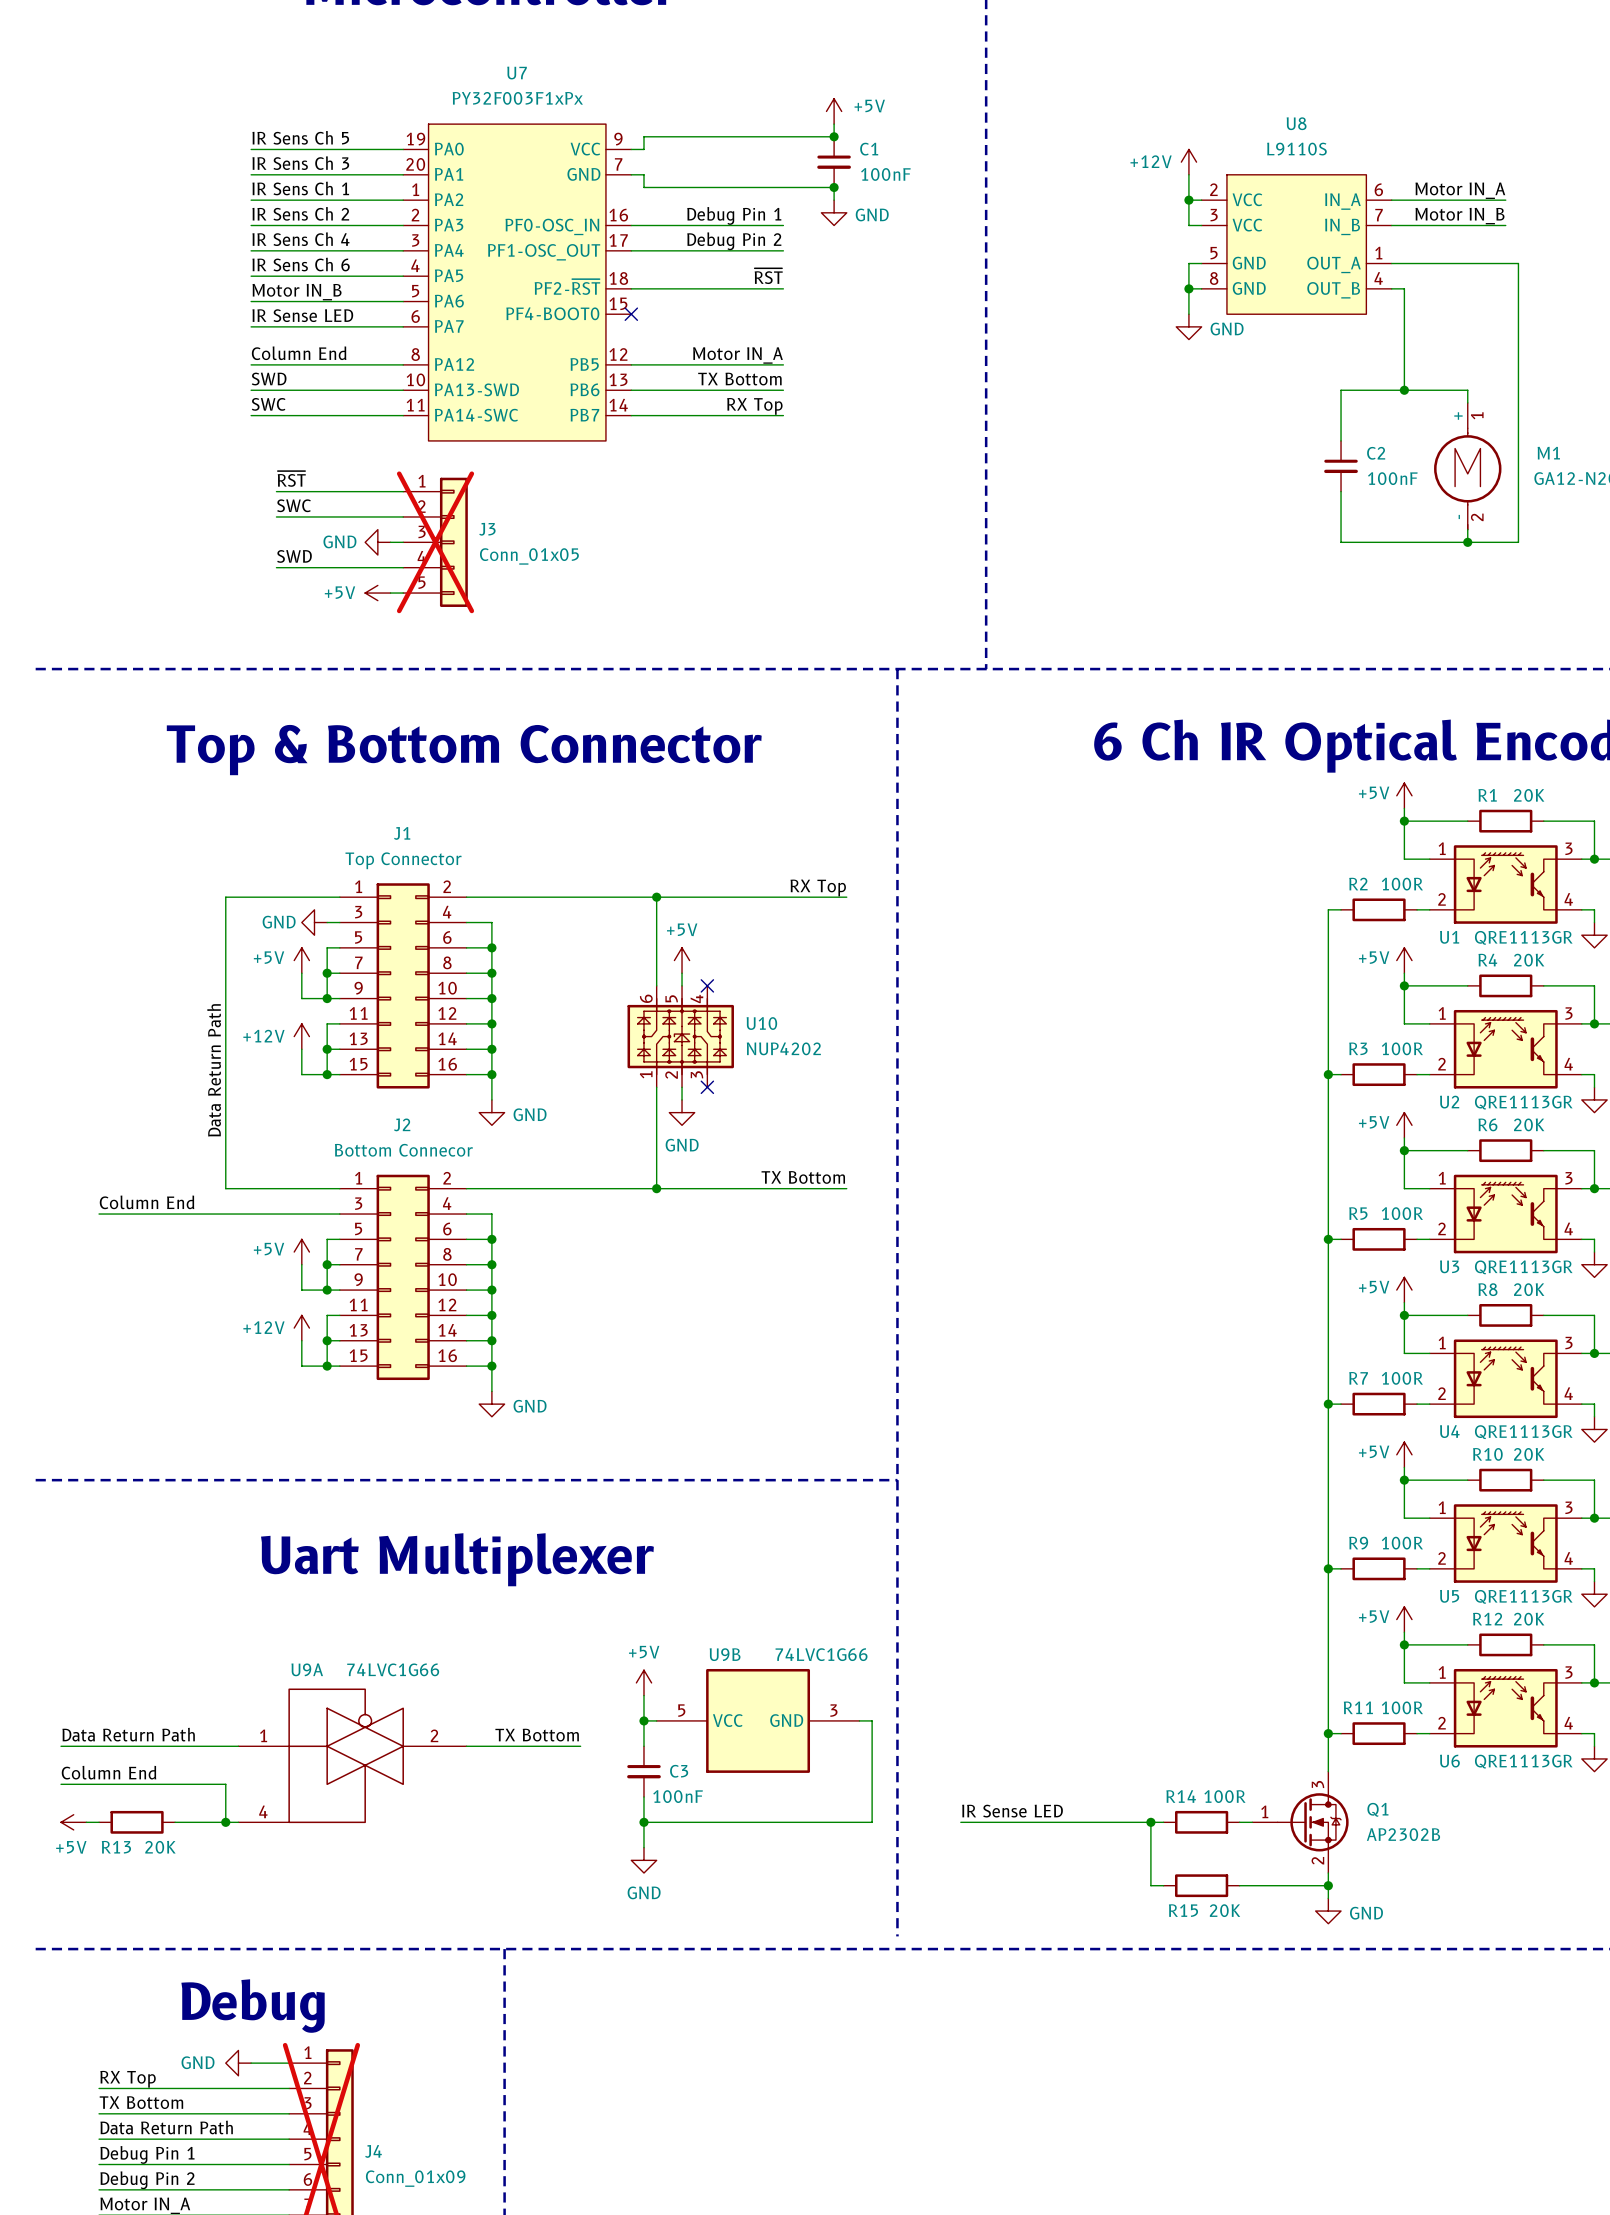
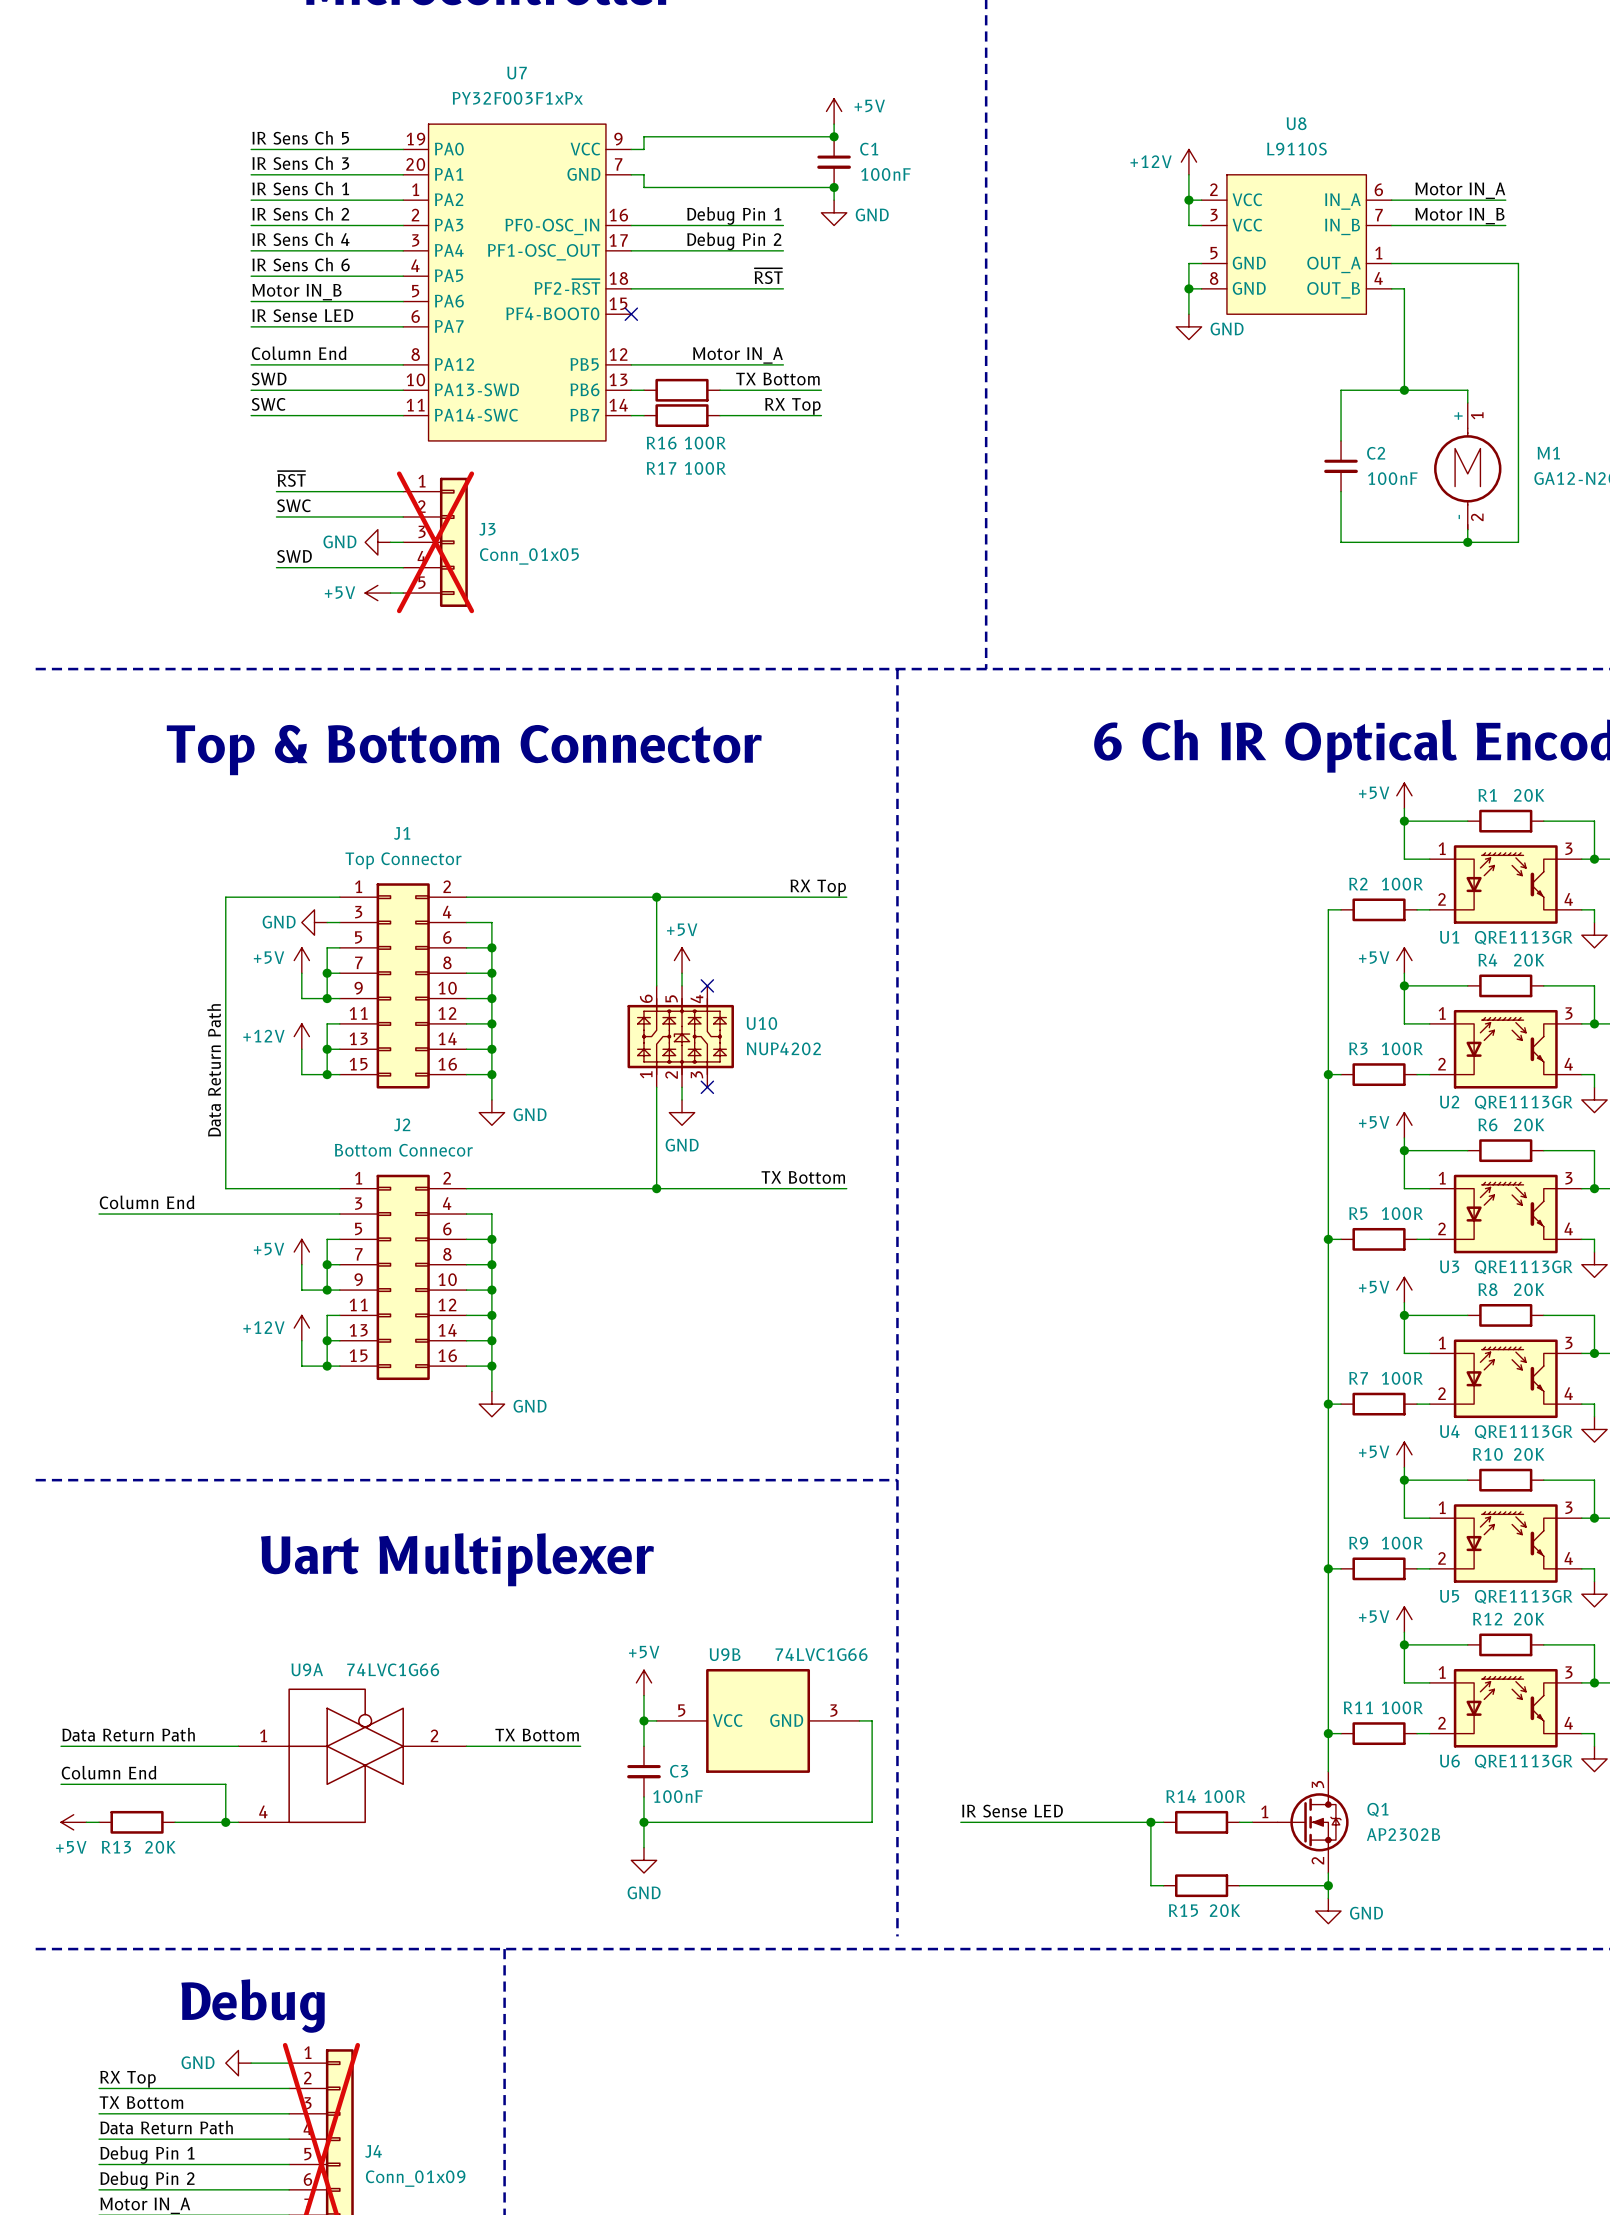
label position: TX Bottom (739, 379) -> TX Bottom (777, 379)
wire: (643, 390) (720, 390) -> none
R16: none -> 100R (682, 390)
wire: none -> (783, 390) (821, 390)
label position: RX Top (754, 406) -> RX Top (792, 406)
wire: (643, 415) (720, 415) -> none
R17: none -> 100R (682, 415)
wire: none -> (783, 415) (821, 415)

